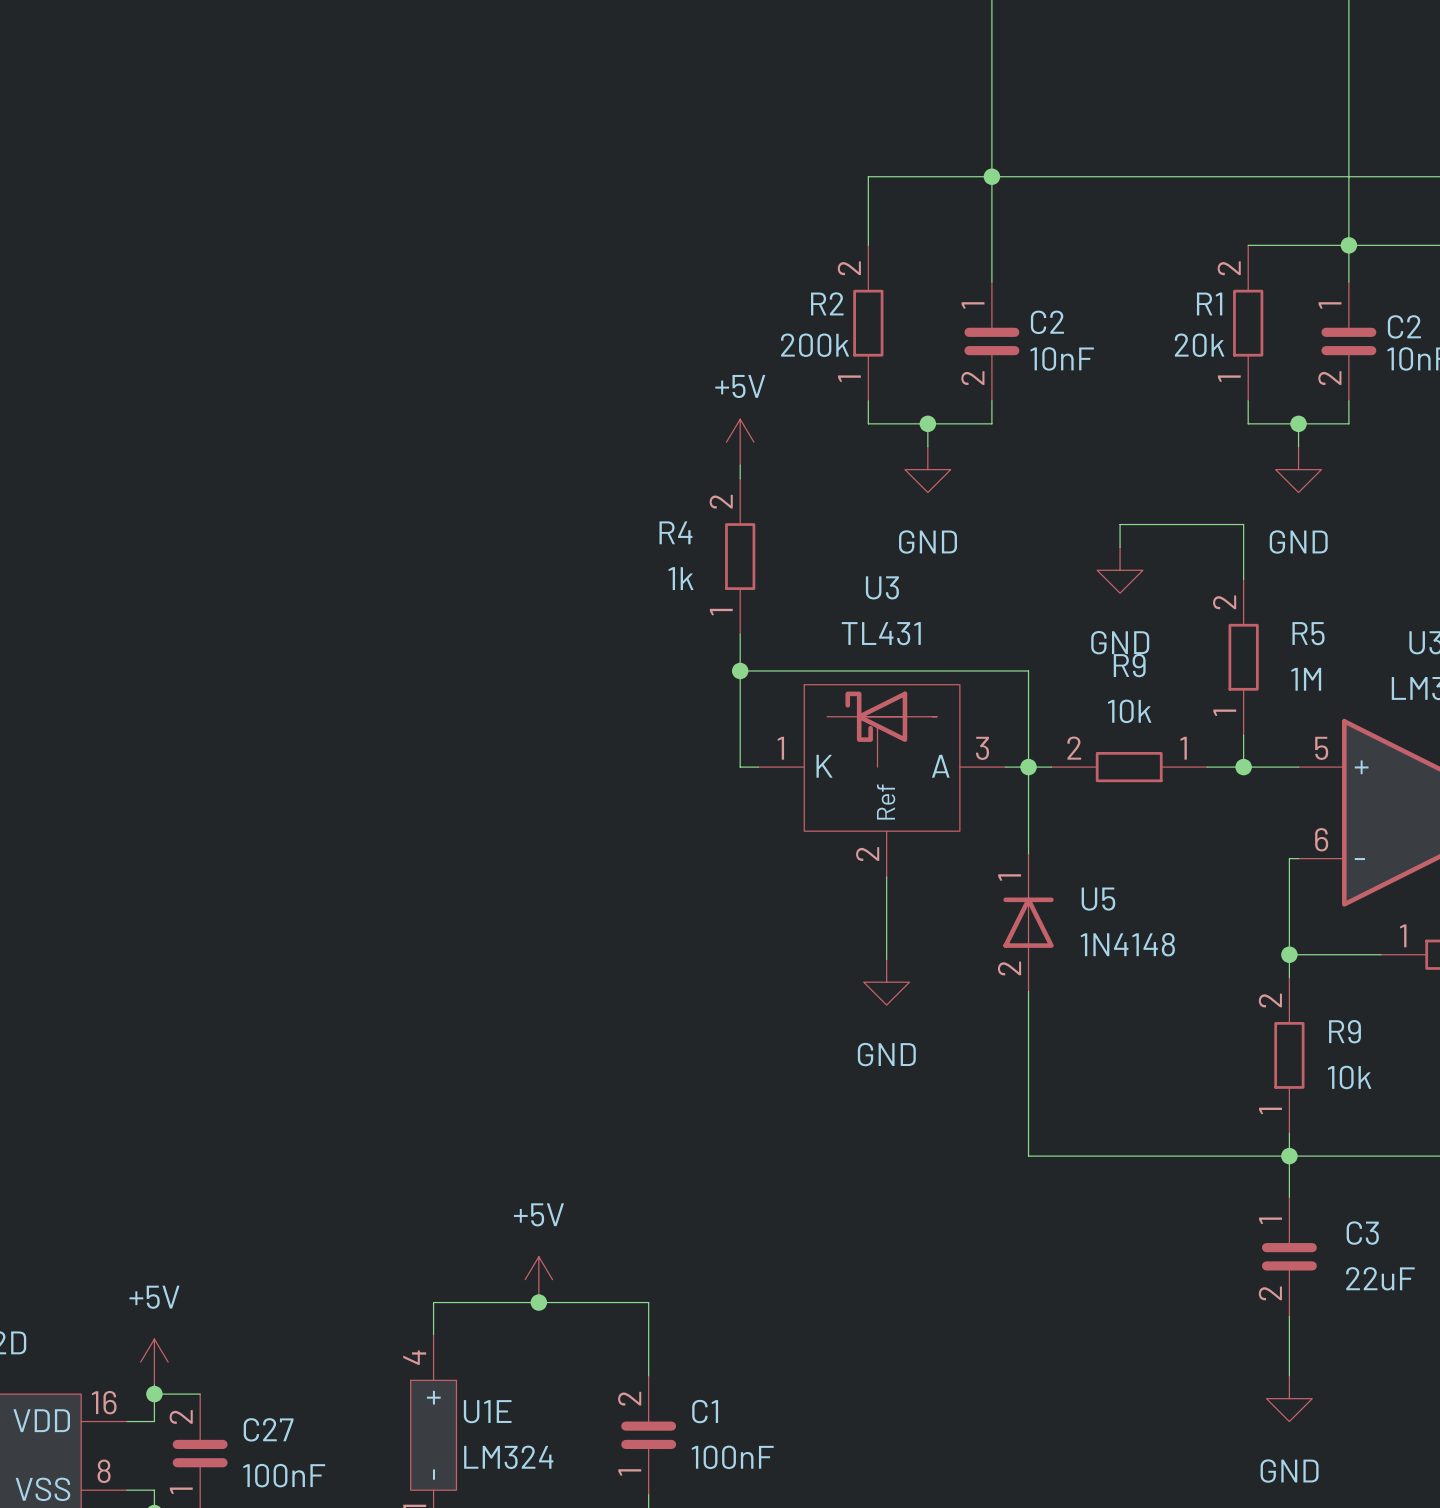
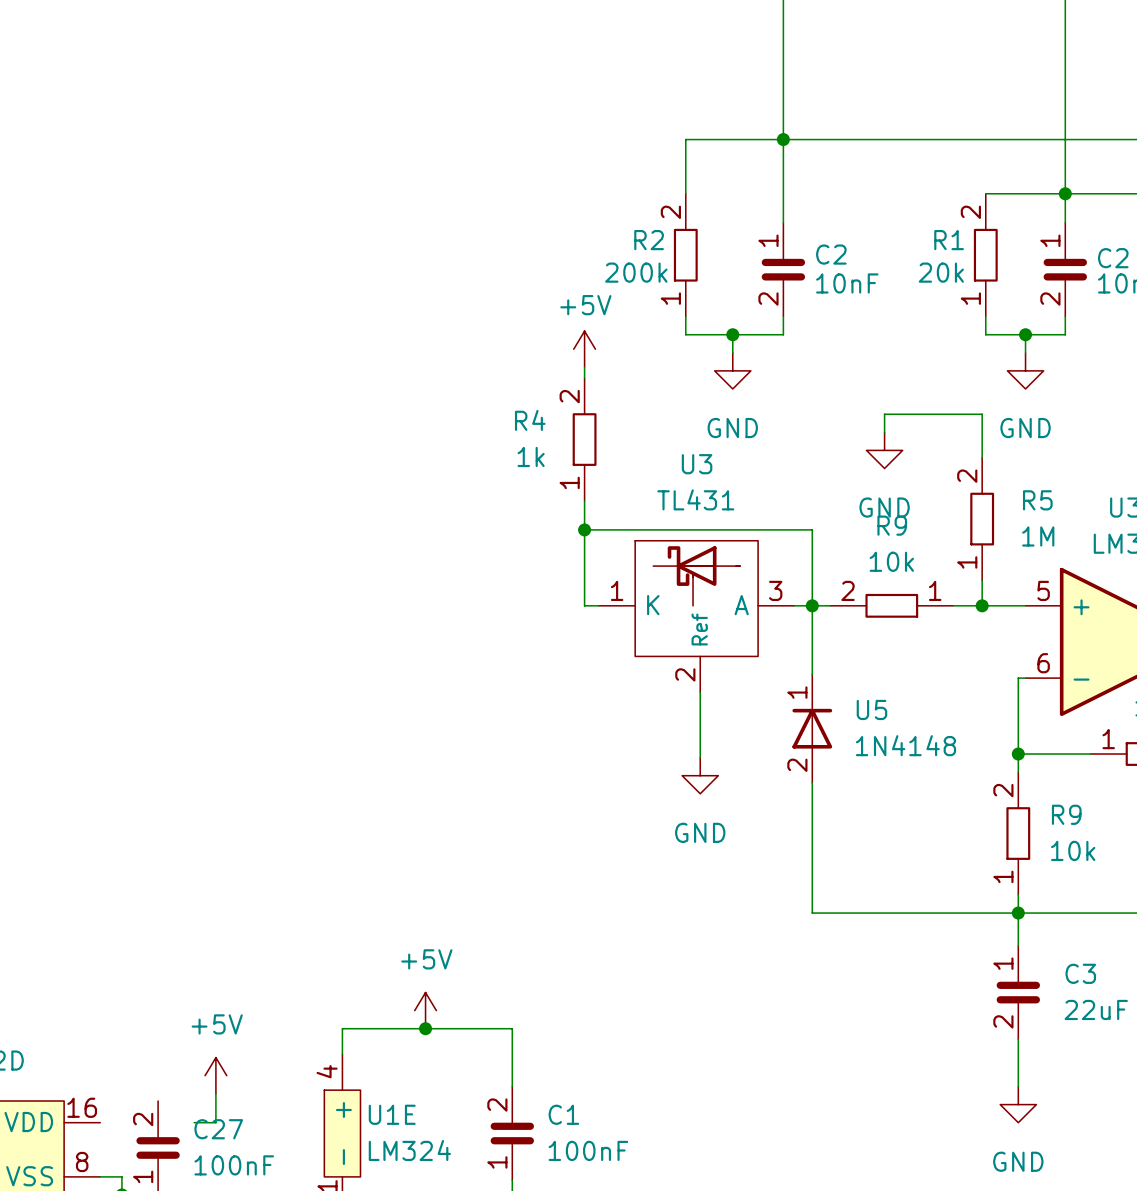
power symbol position: +5V (154, 1362) -> +5V (215, 1075)
wire: (154, 1384) (154, 1421) (126, 1421) -> (215, 1093) (215, 1122) (194, 1122)
wire: (154, 1394) (200, 1394) -> none
junction: (154, 1394) -> none

